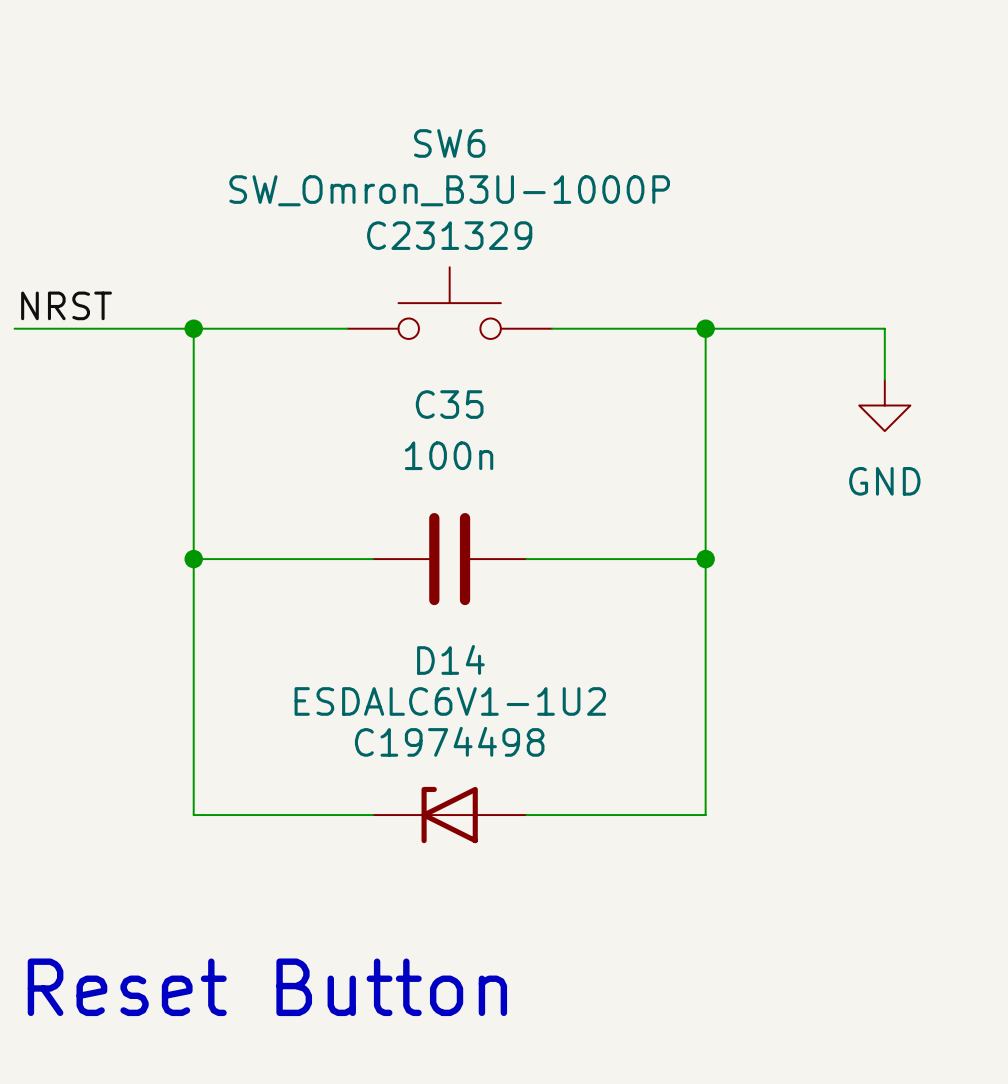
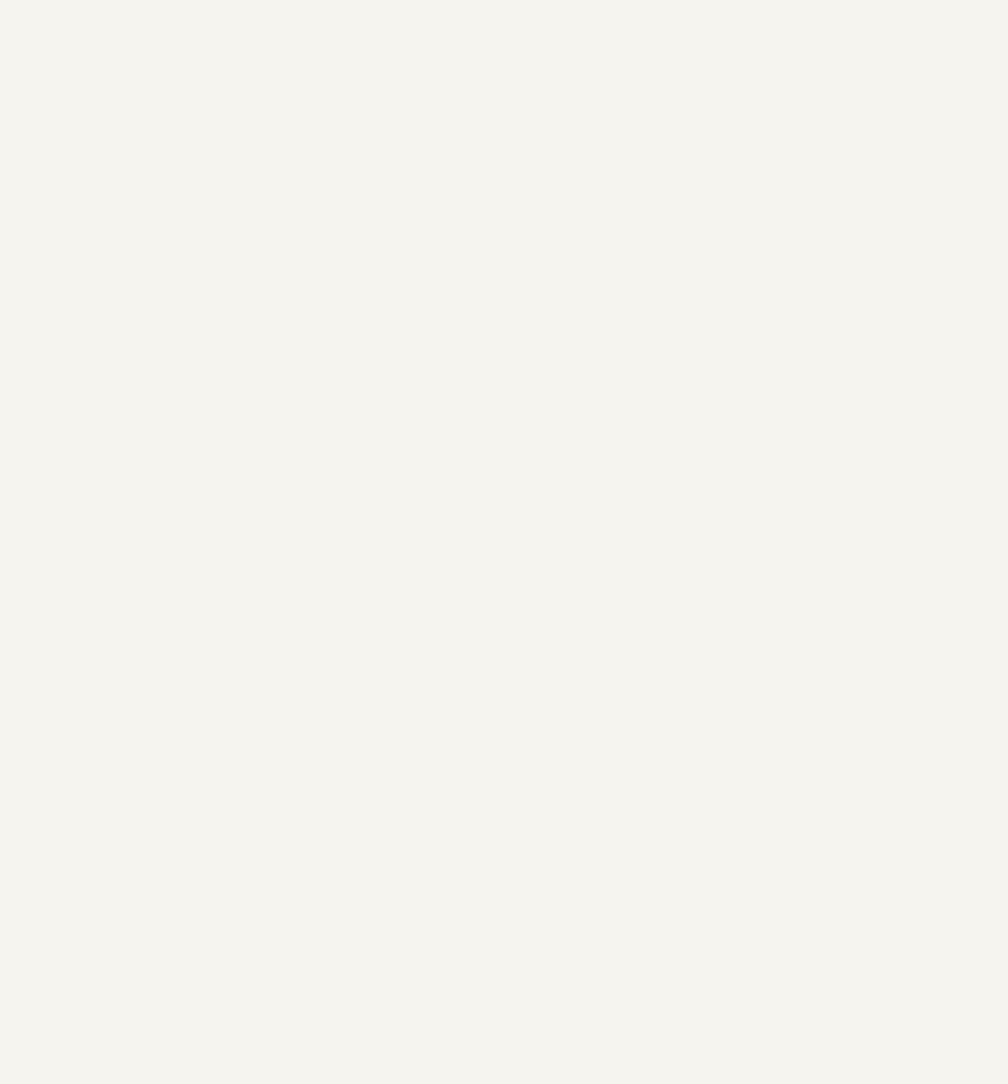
SW6: SW_Omron_B3U-1000P (449, 303) -> none
label: NRST (66, 305) -> none
wire: (14, 328) (347, 328) -> none
wire: (193, 328) (193, 815) (372, 815) -> none
junction: (193, 328) -> none
wire: (552, 328) (884, 328) (884, 379) -> none
wire: (705, 328) (705, 815) (526, 815) -> none
junction: (705, 328) -> none
power symbol: GND (884, 405) -> none
wire: (193, 559) (372, 559) -> none
junction: (193, 559) -> none
C35: 100n (449, 559) -> none
wire: (526, 559) (705, 559) -> none
junction: (705, 559) -> none
D14: ESDALC6V1-1U2 (449, 815) -> none
text: Reset Button (267, 987) -> none

